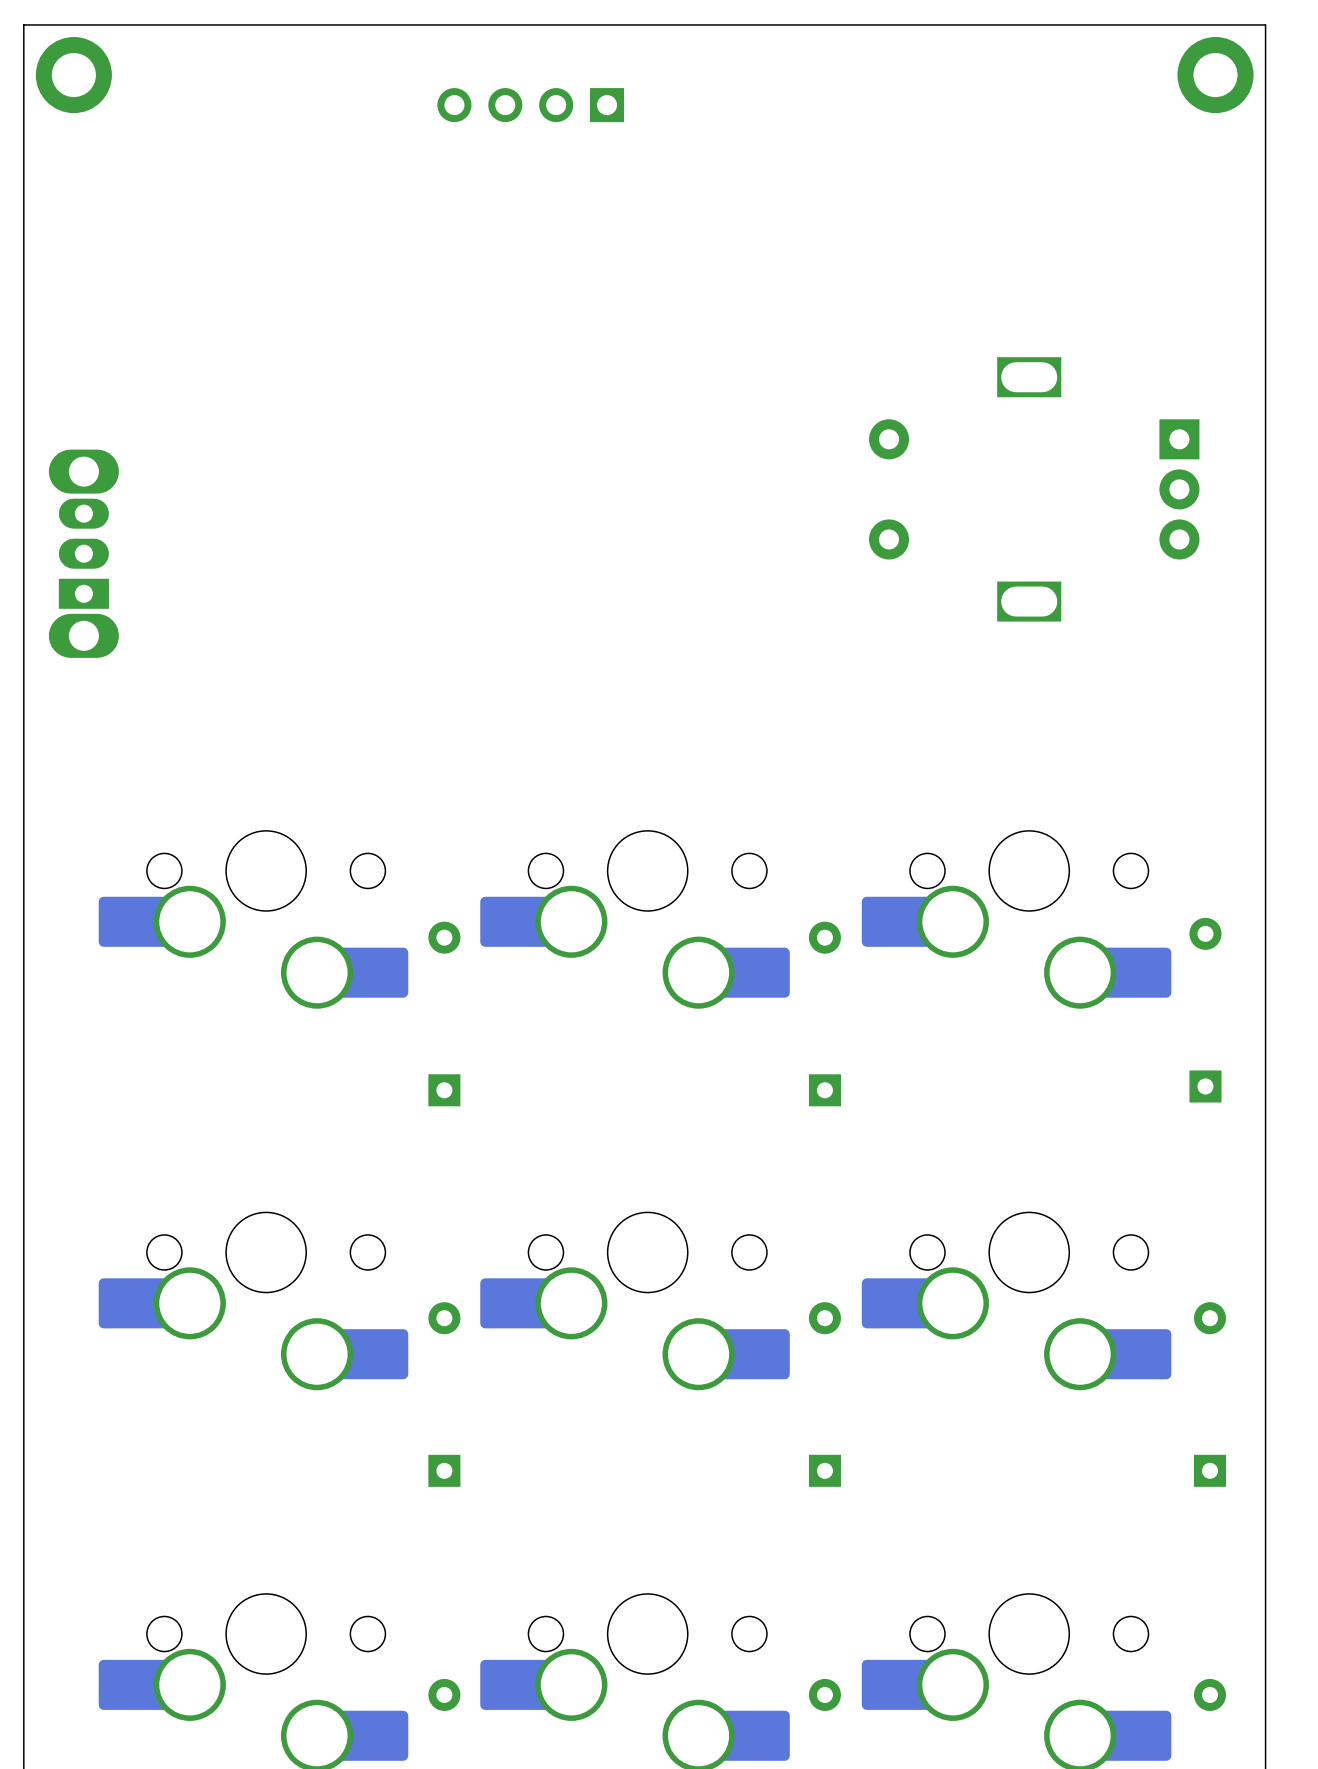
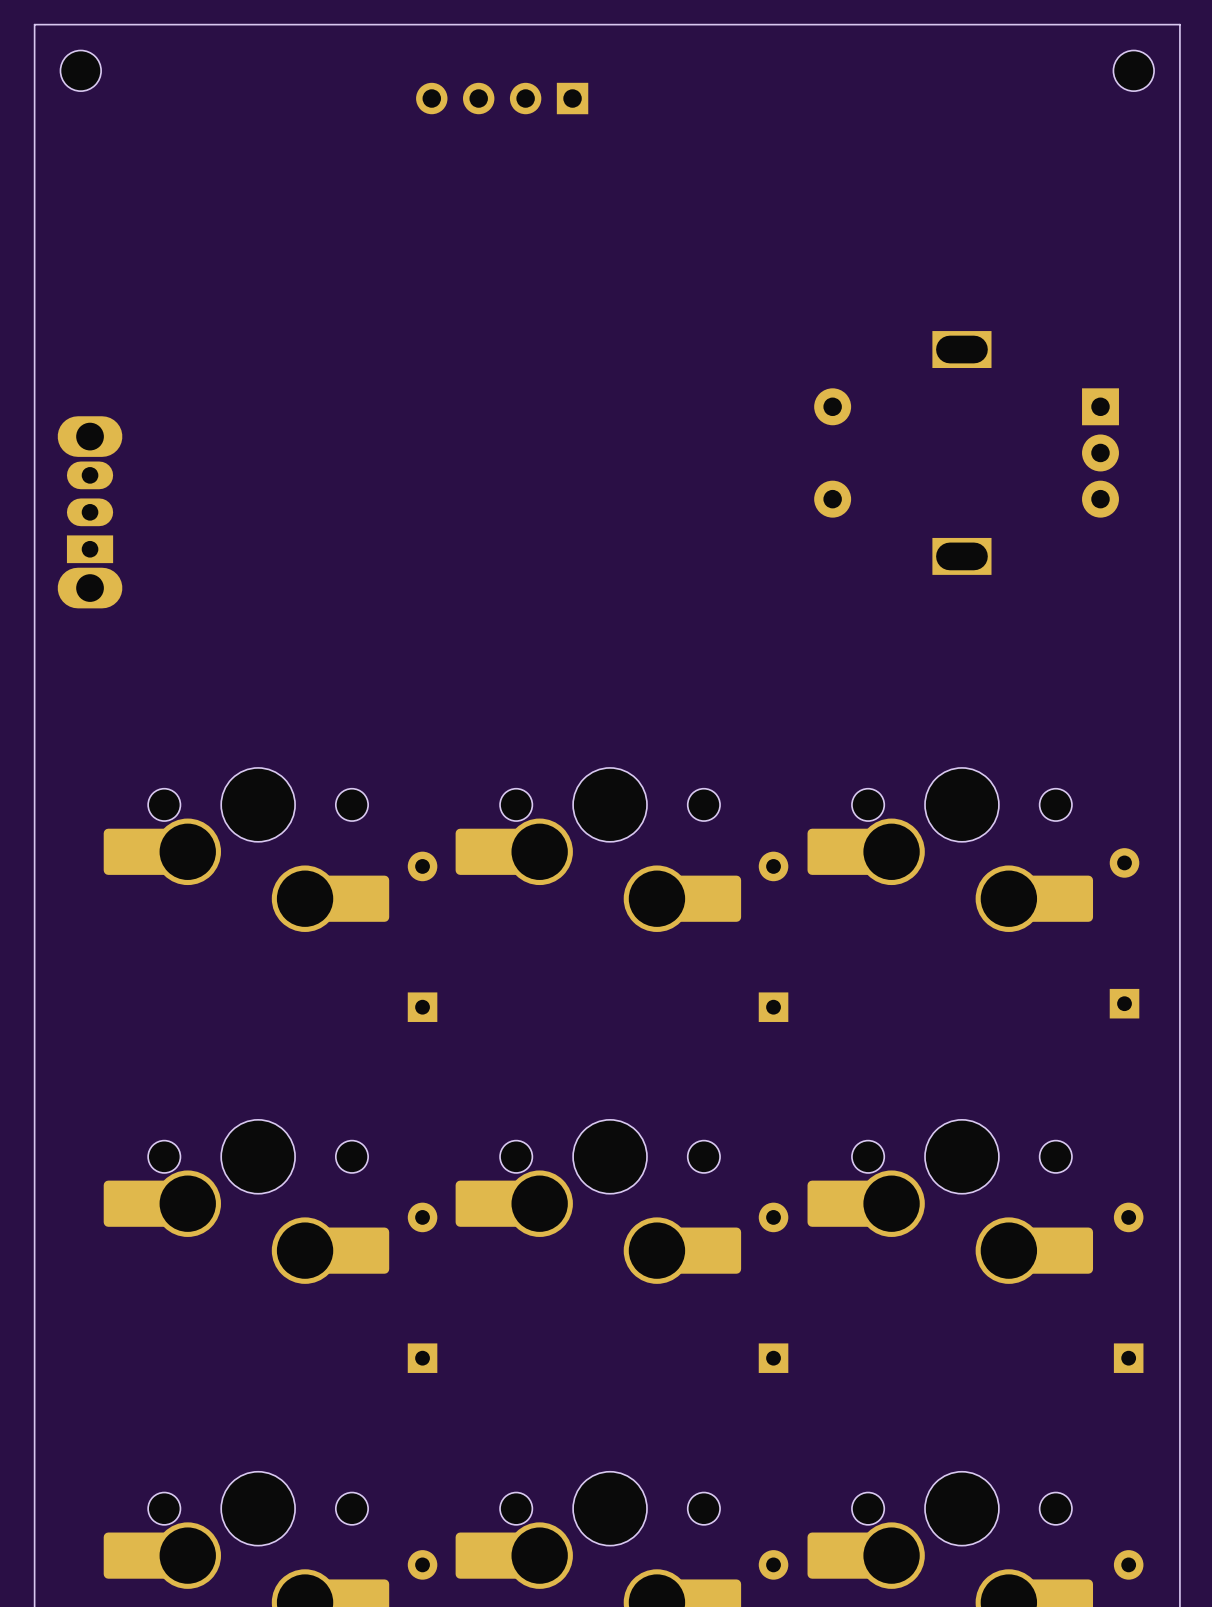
part footprint: [35, 37, 112, 114] -> [60, 50, 102, 92]
part footprint: [1177, 37, 1254, 114] -> [1113, 50, 1155, 92]

